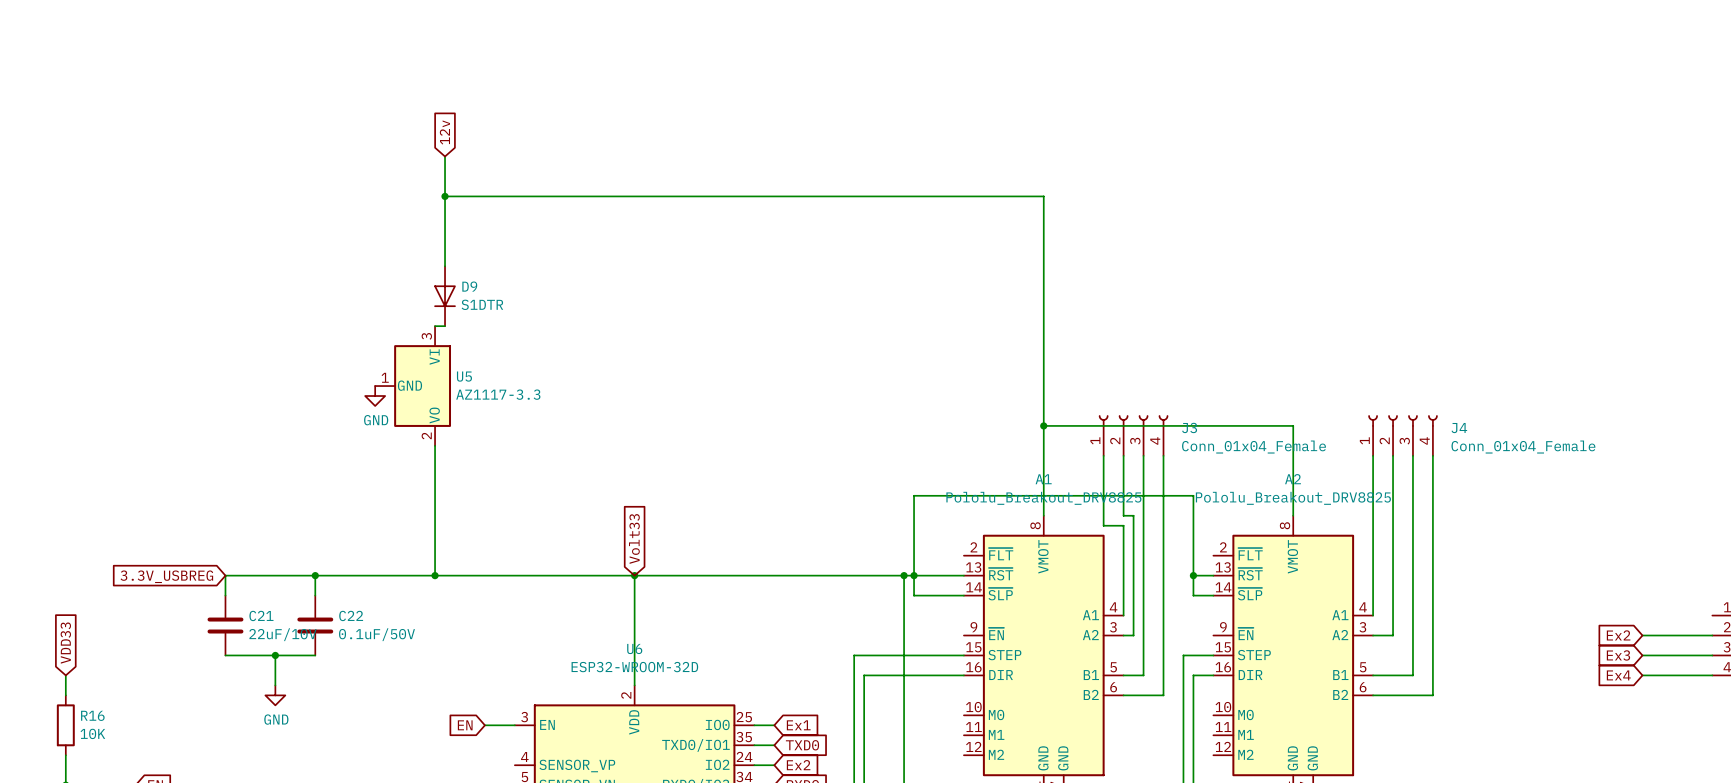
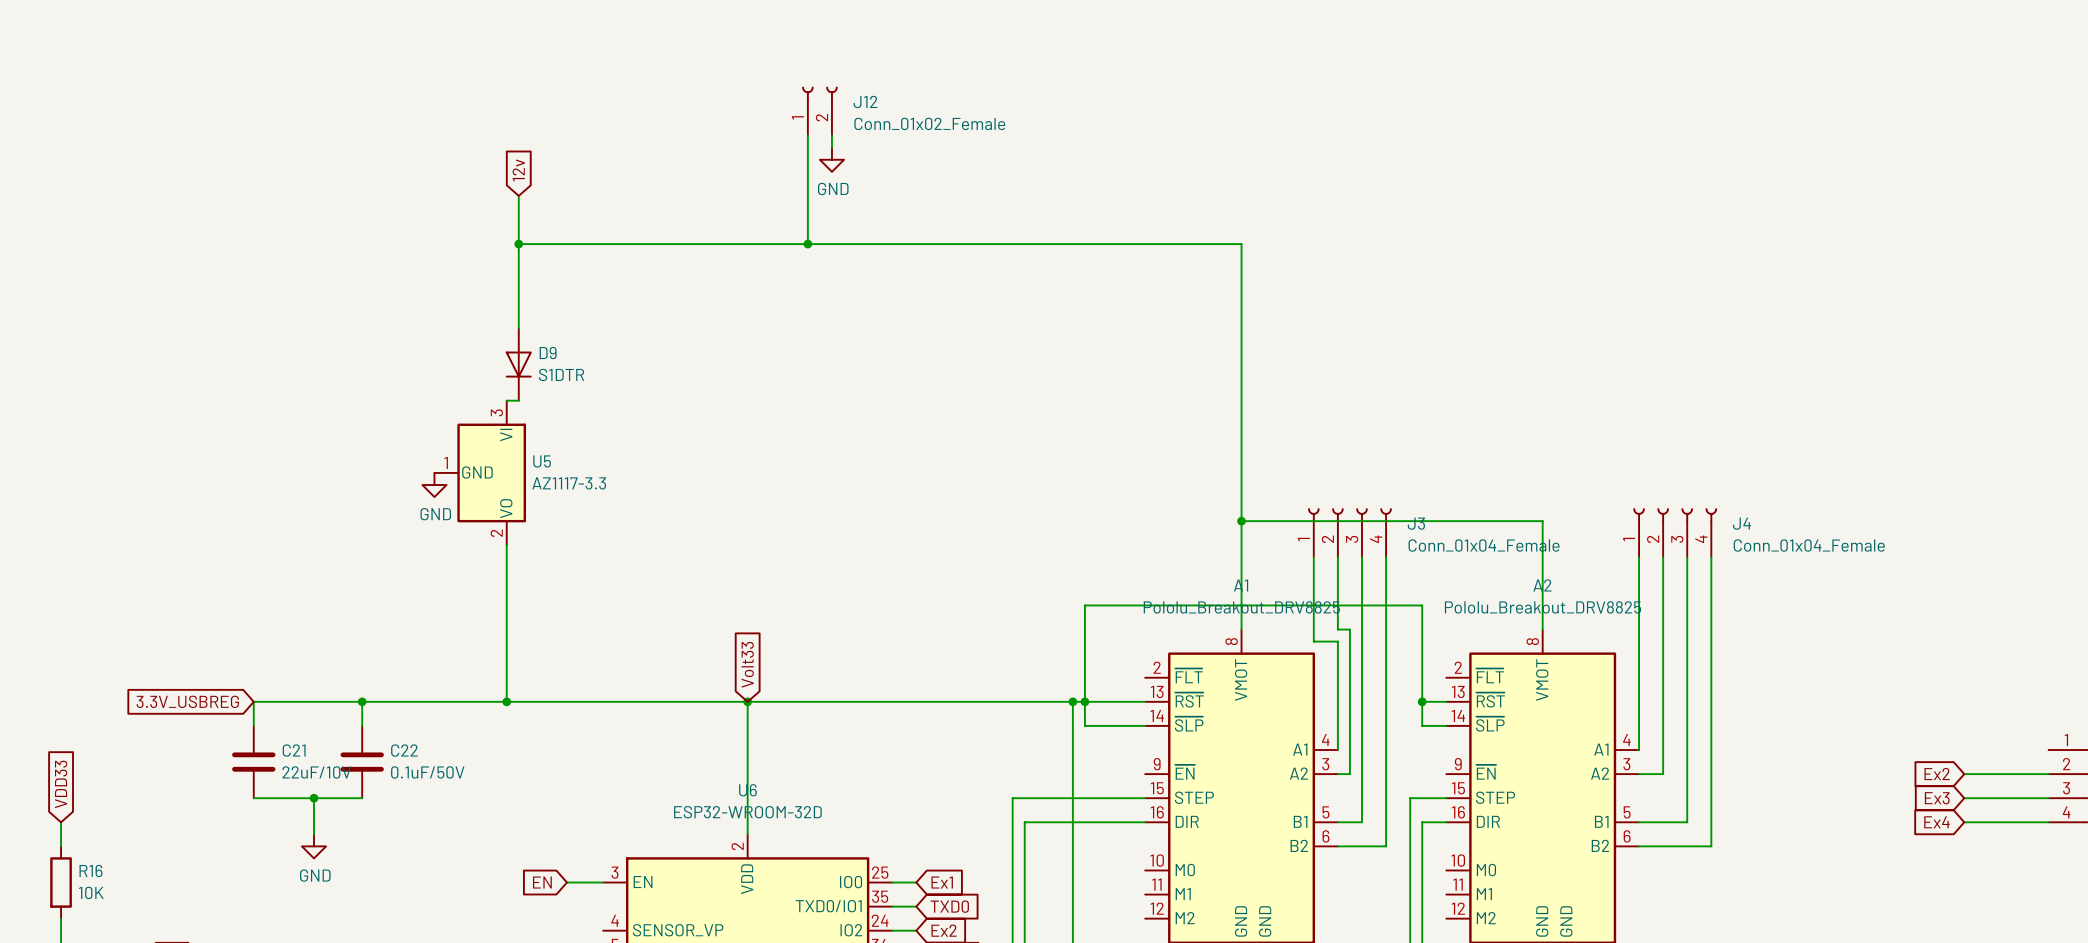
J12: none -> Conn_01x02_Female (819, 111)
wire: none -> (807, 135) (807, 244)
wire: none -> (831, 135) (831, 147)
power symbol: none -> GND (831, 159)
junction: none -> (807, 244)

